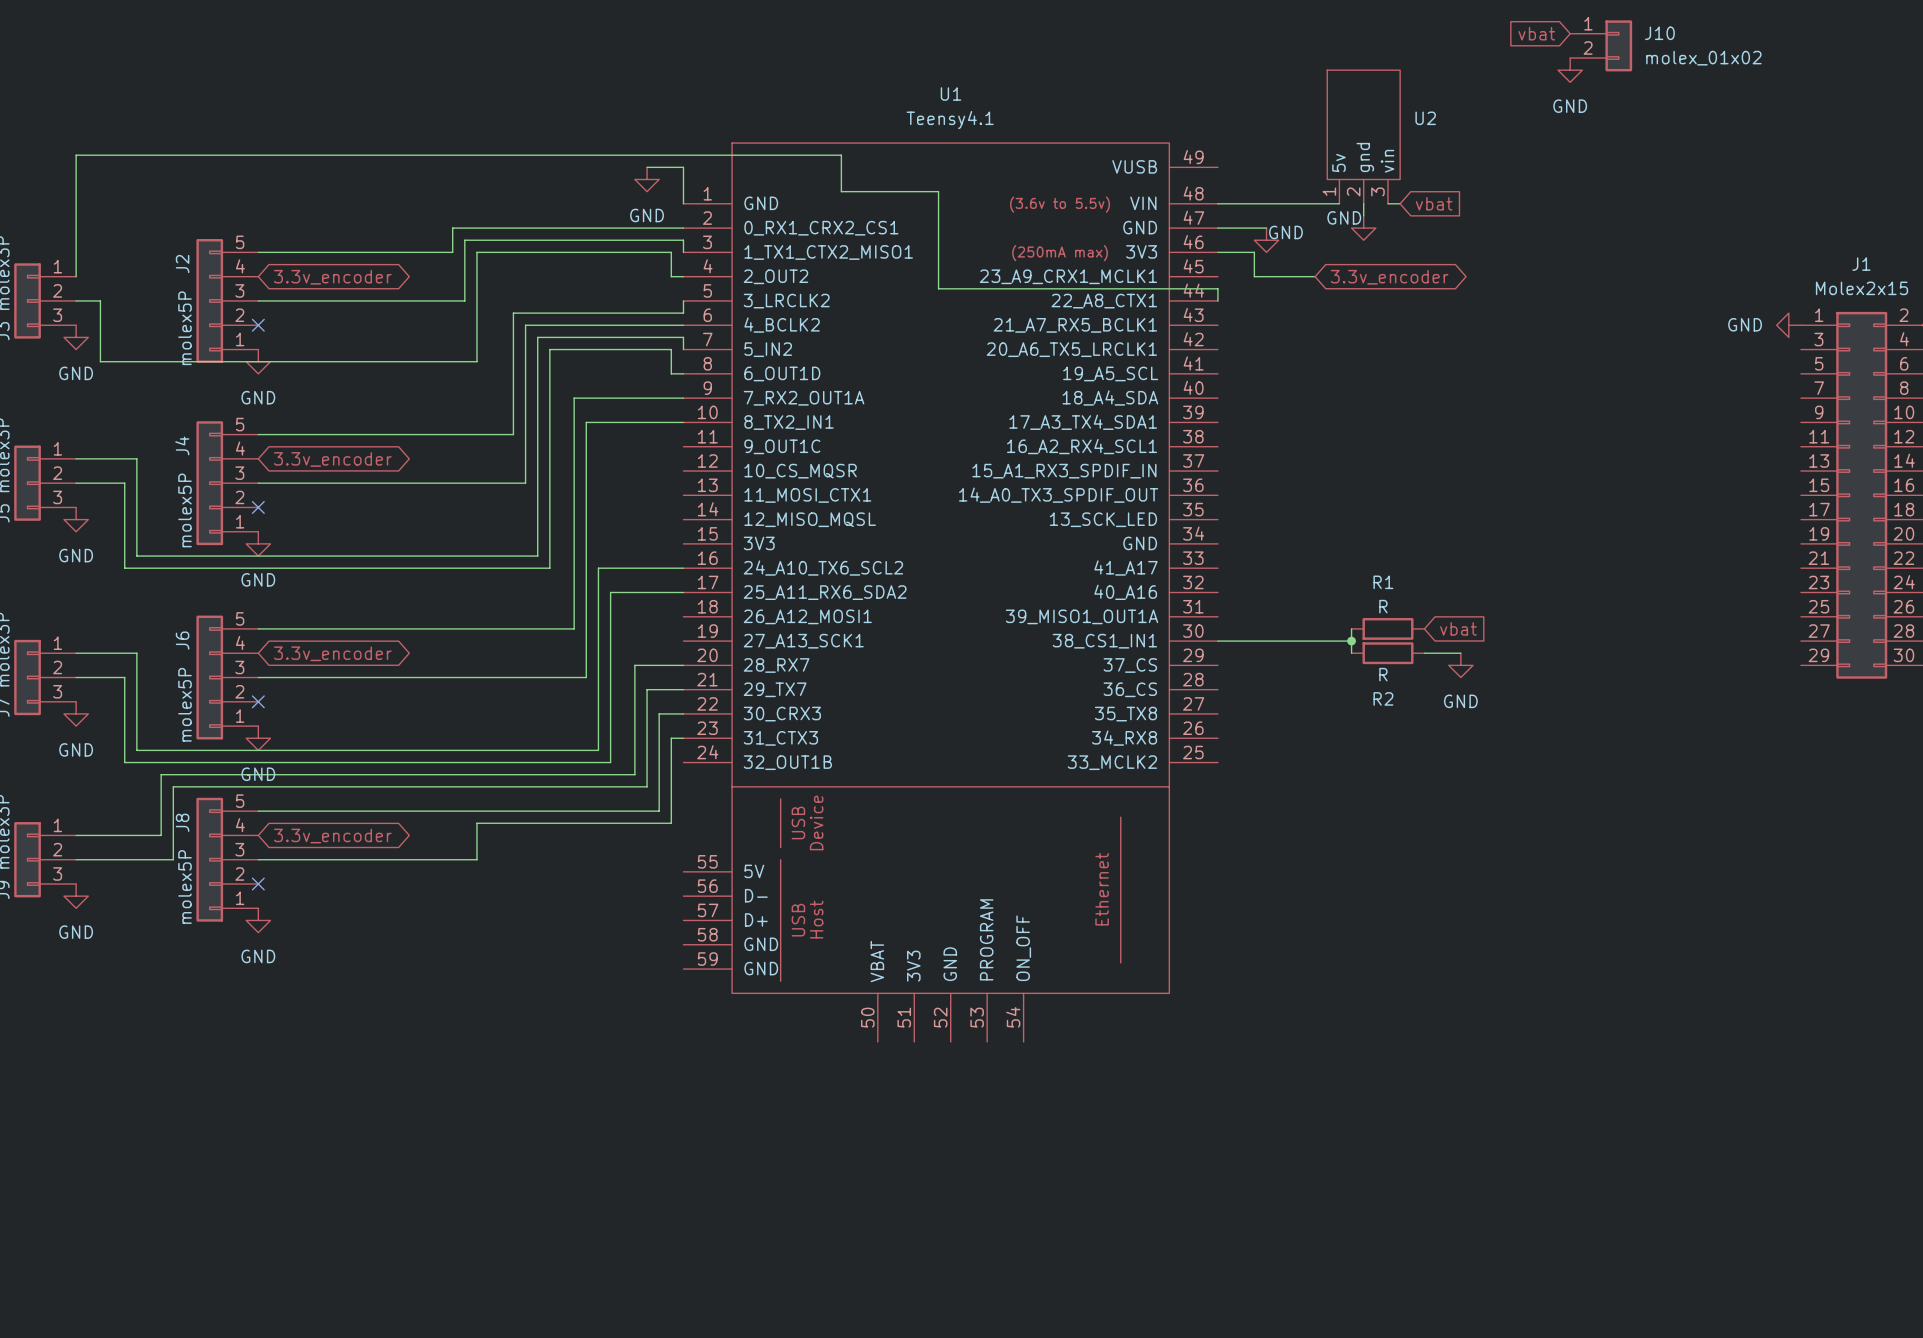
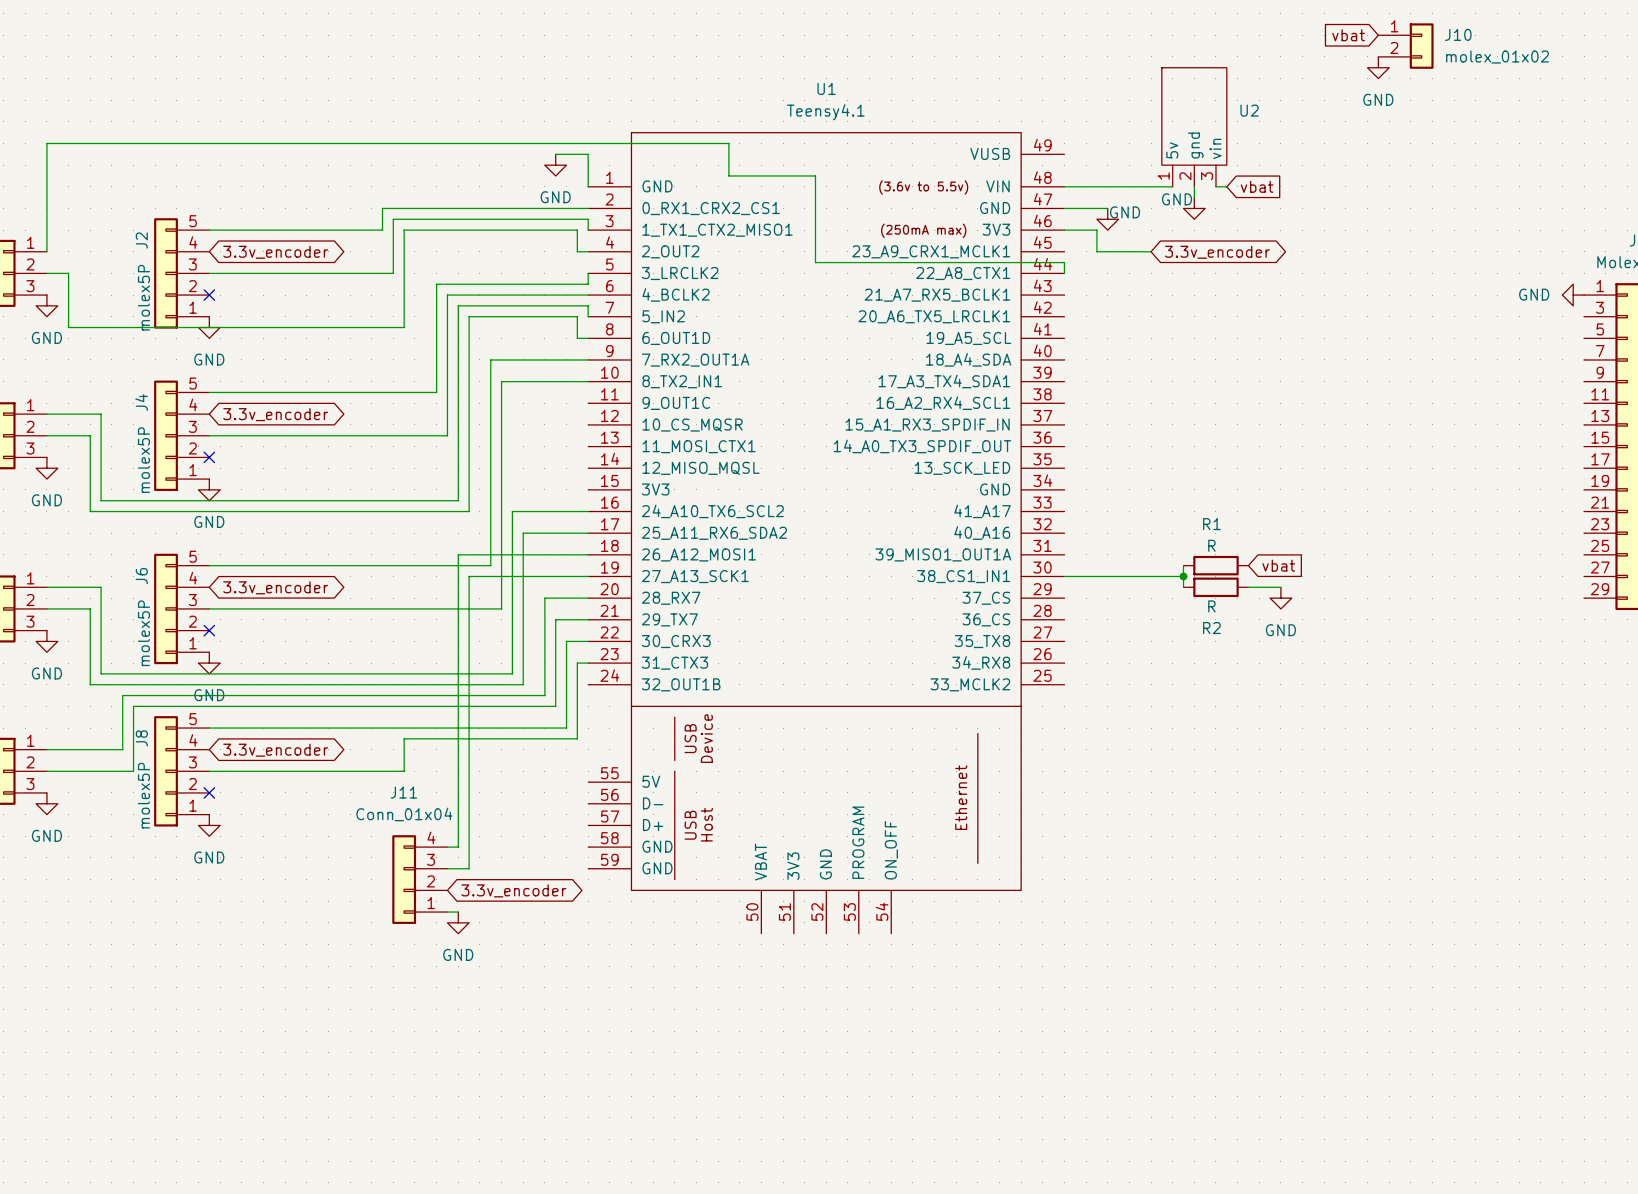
wire: none -> (588, 554) (458, 554) (458, 847) (447, 847)
wire: none -> (588, 576) (469, 576) (469, 868) (447, 868)
J11: none -> Conn_01x04 (419, 879)
global label: none -> 3.3v_encoder (513, 890)
wire: none -> (447, 912) (458, 912)
power symbol: none -> GND (458, 922)

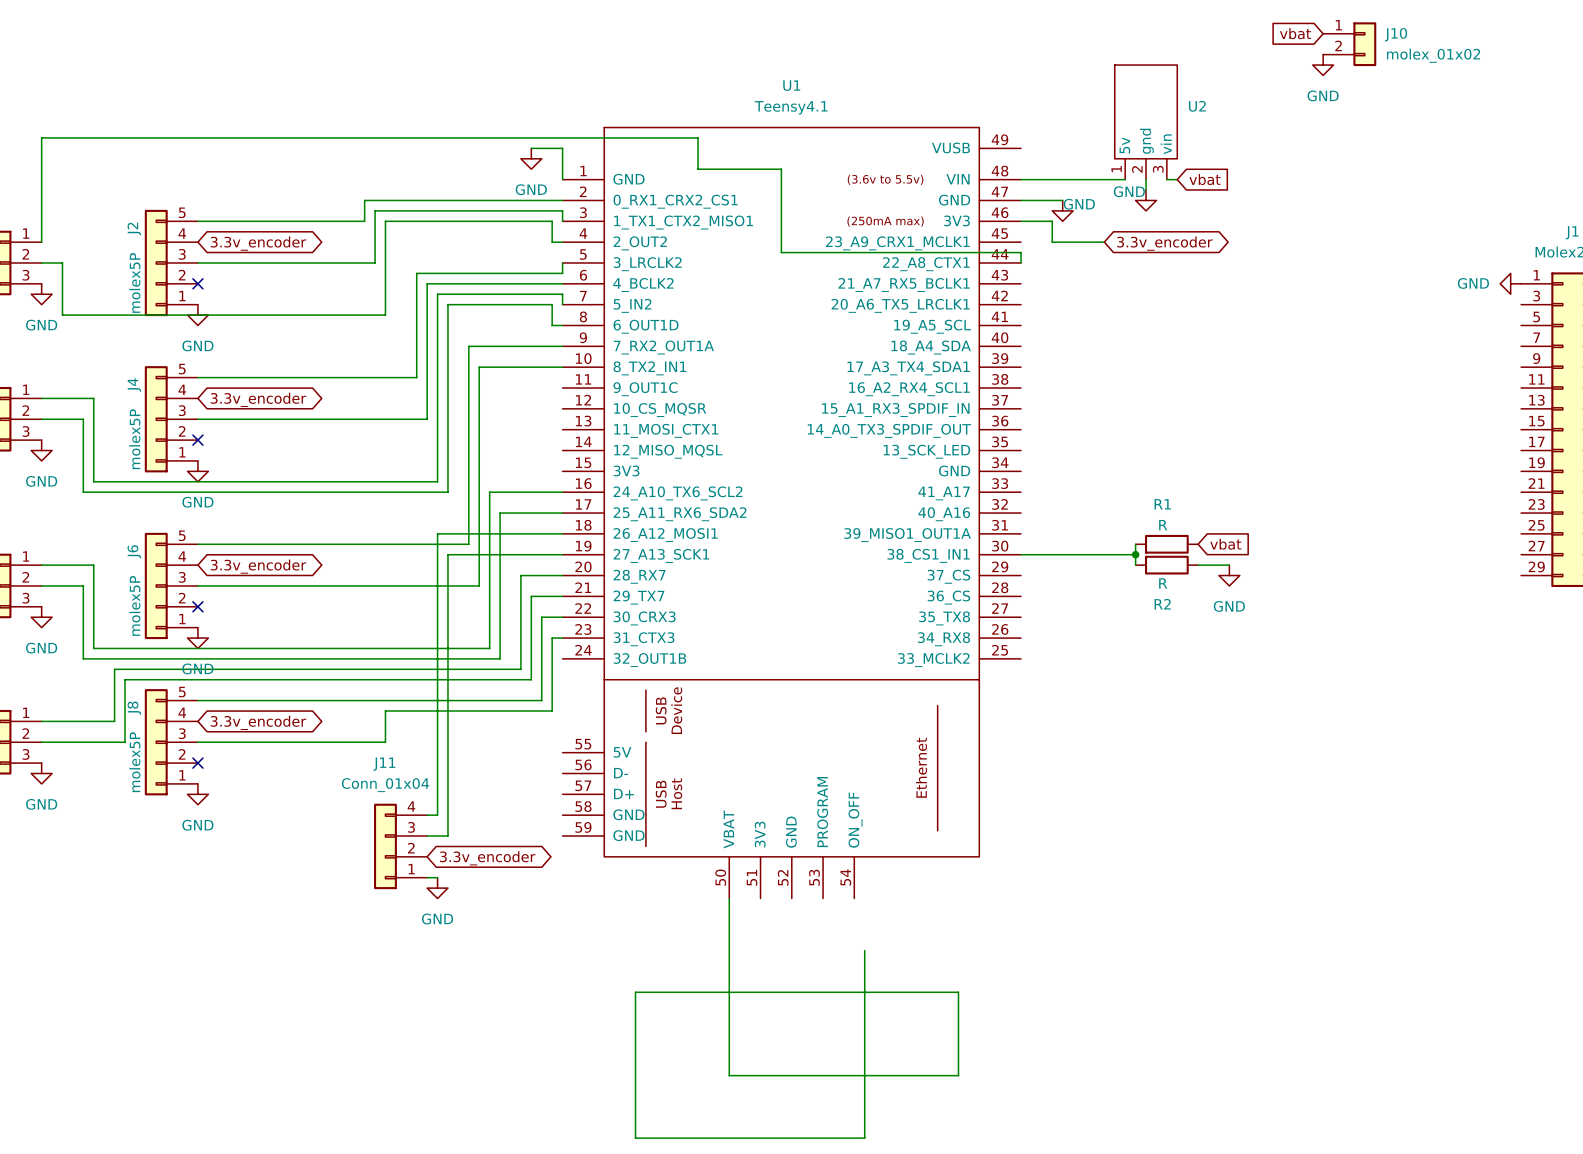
wire: none -> (729, 898) (729, 1075) (958, 1075) (958, 992) (635, 992) (635, 1138) (864, 1138) (864, 950)

